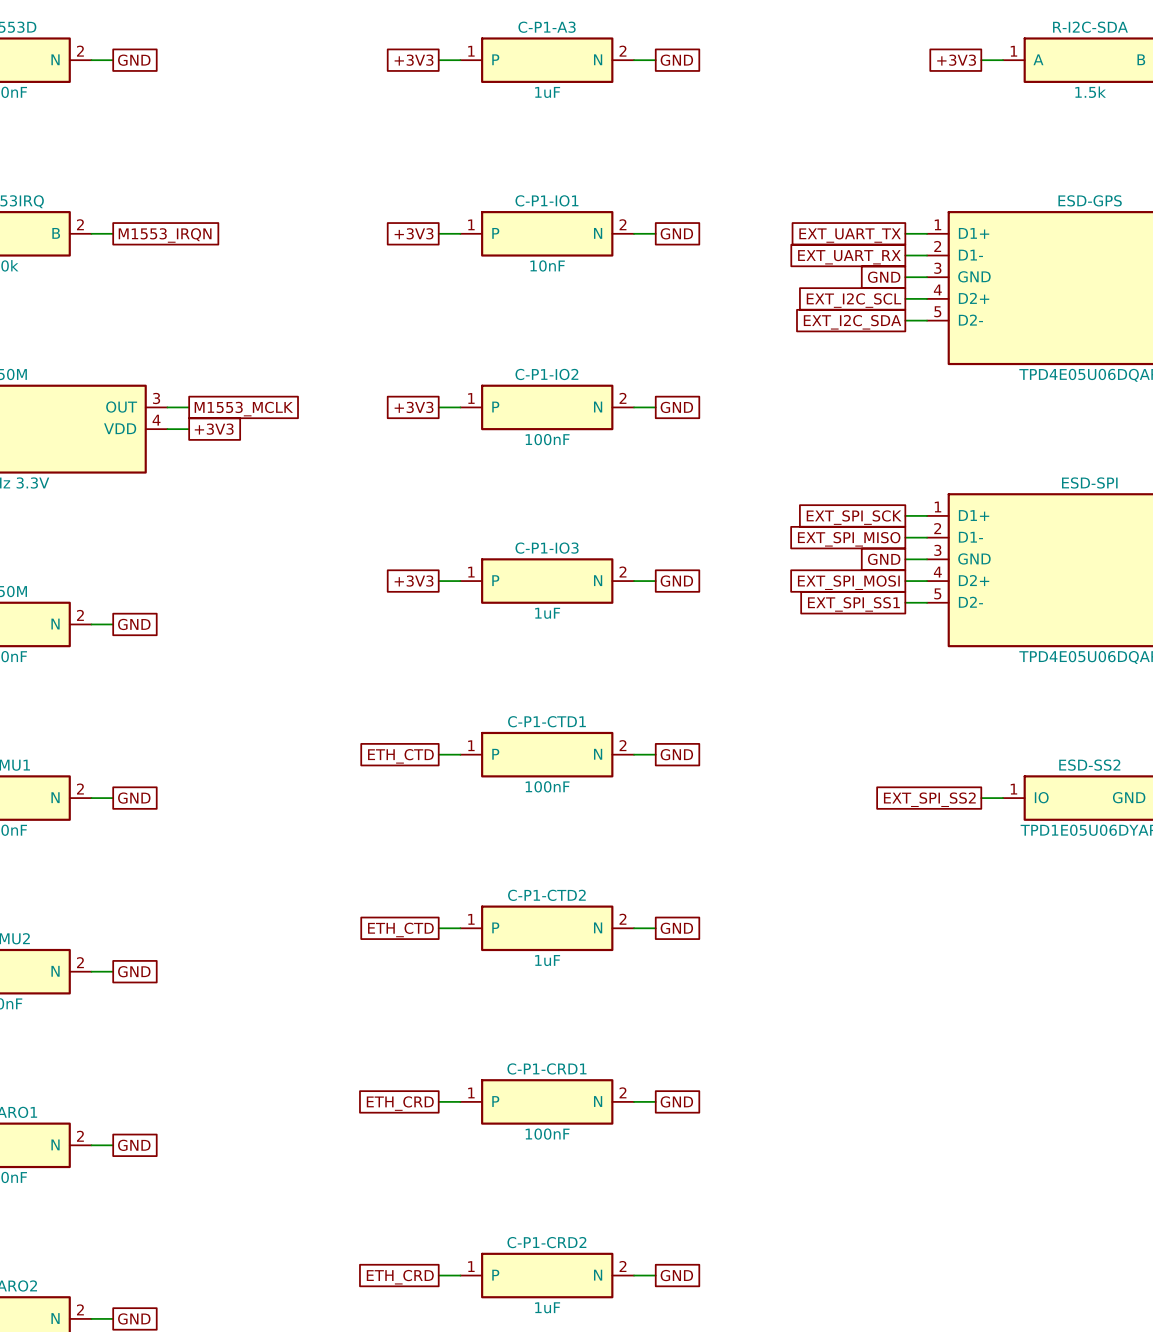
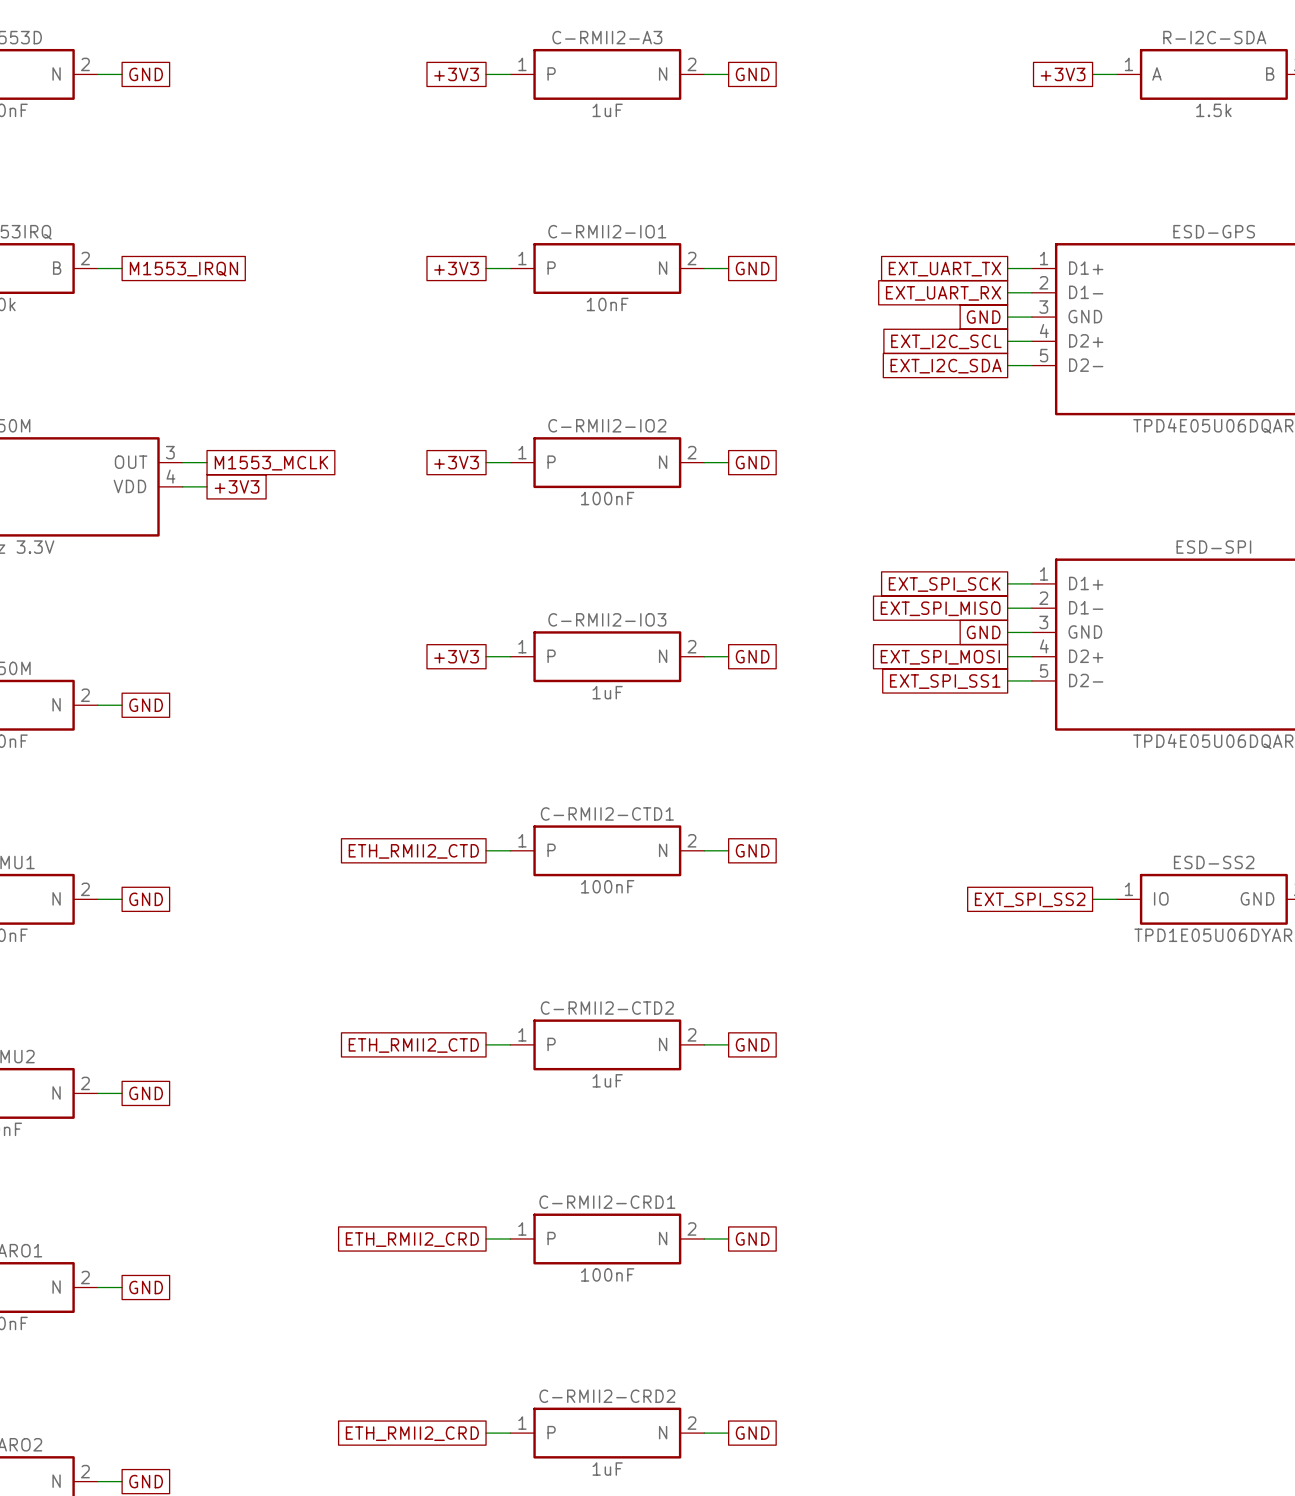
C-P1-A3 name: C-P1-A3 (547, 27) -> C-RMII2-A3 (607, 37)
C-P1-IO1 name: C-P1-IO1 (546, 200) -> C-RMII2-IO1 (607, 231)
C-P1-IO2 name: C-P1-IO2 (546, 374) -> C-RMII2-IO2 (607, 425)
C-P1-IO3 name: C-P1-IO3 (547, 548) -> C-RMII2-IO3 (607, 619)
C-P1-CTD1 name: C-P1-CTD1 (546, 721) -> C-RMII2-CTD1 (607, 813)
global label: ETH_CTD (400, 756) -> ETH_RMII2_CTD (413, 851)
C-P1-CTD2 name: C-P1-CTD2 (546, 895) -> C-RMII2-CTD2 (607, 1008)
global label: ETH_CTD (400, 929) -> ETH_RMII2_CTD (413, 1045)
C-P1-CRD1 name: C-P1-CRD1 (546, 1068) -> C-RMII2-CRD1 (607, 1202)
global label: ETH_CRD (400, 1103) -> ETH_RMII2_CRD (412, 1239)
C-P1-CRD2 name: C-P1-CRD2 (546, 1242) -> C-RMII2-CRD2 (607, 1396)
global label: ETH_CRD (400, 1277) -> ETH_RMII2_CRD (412, 1433)

